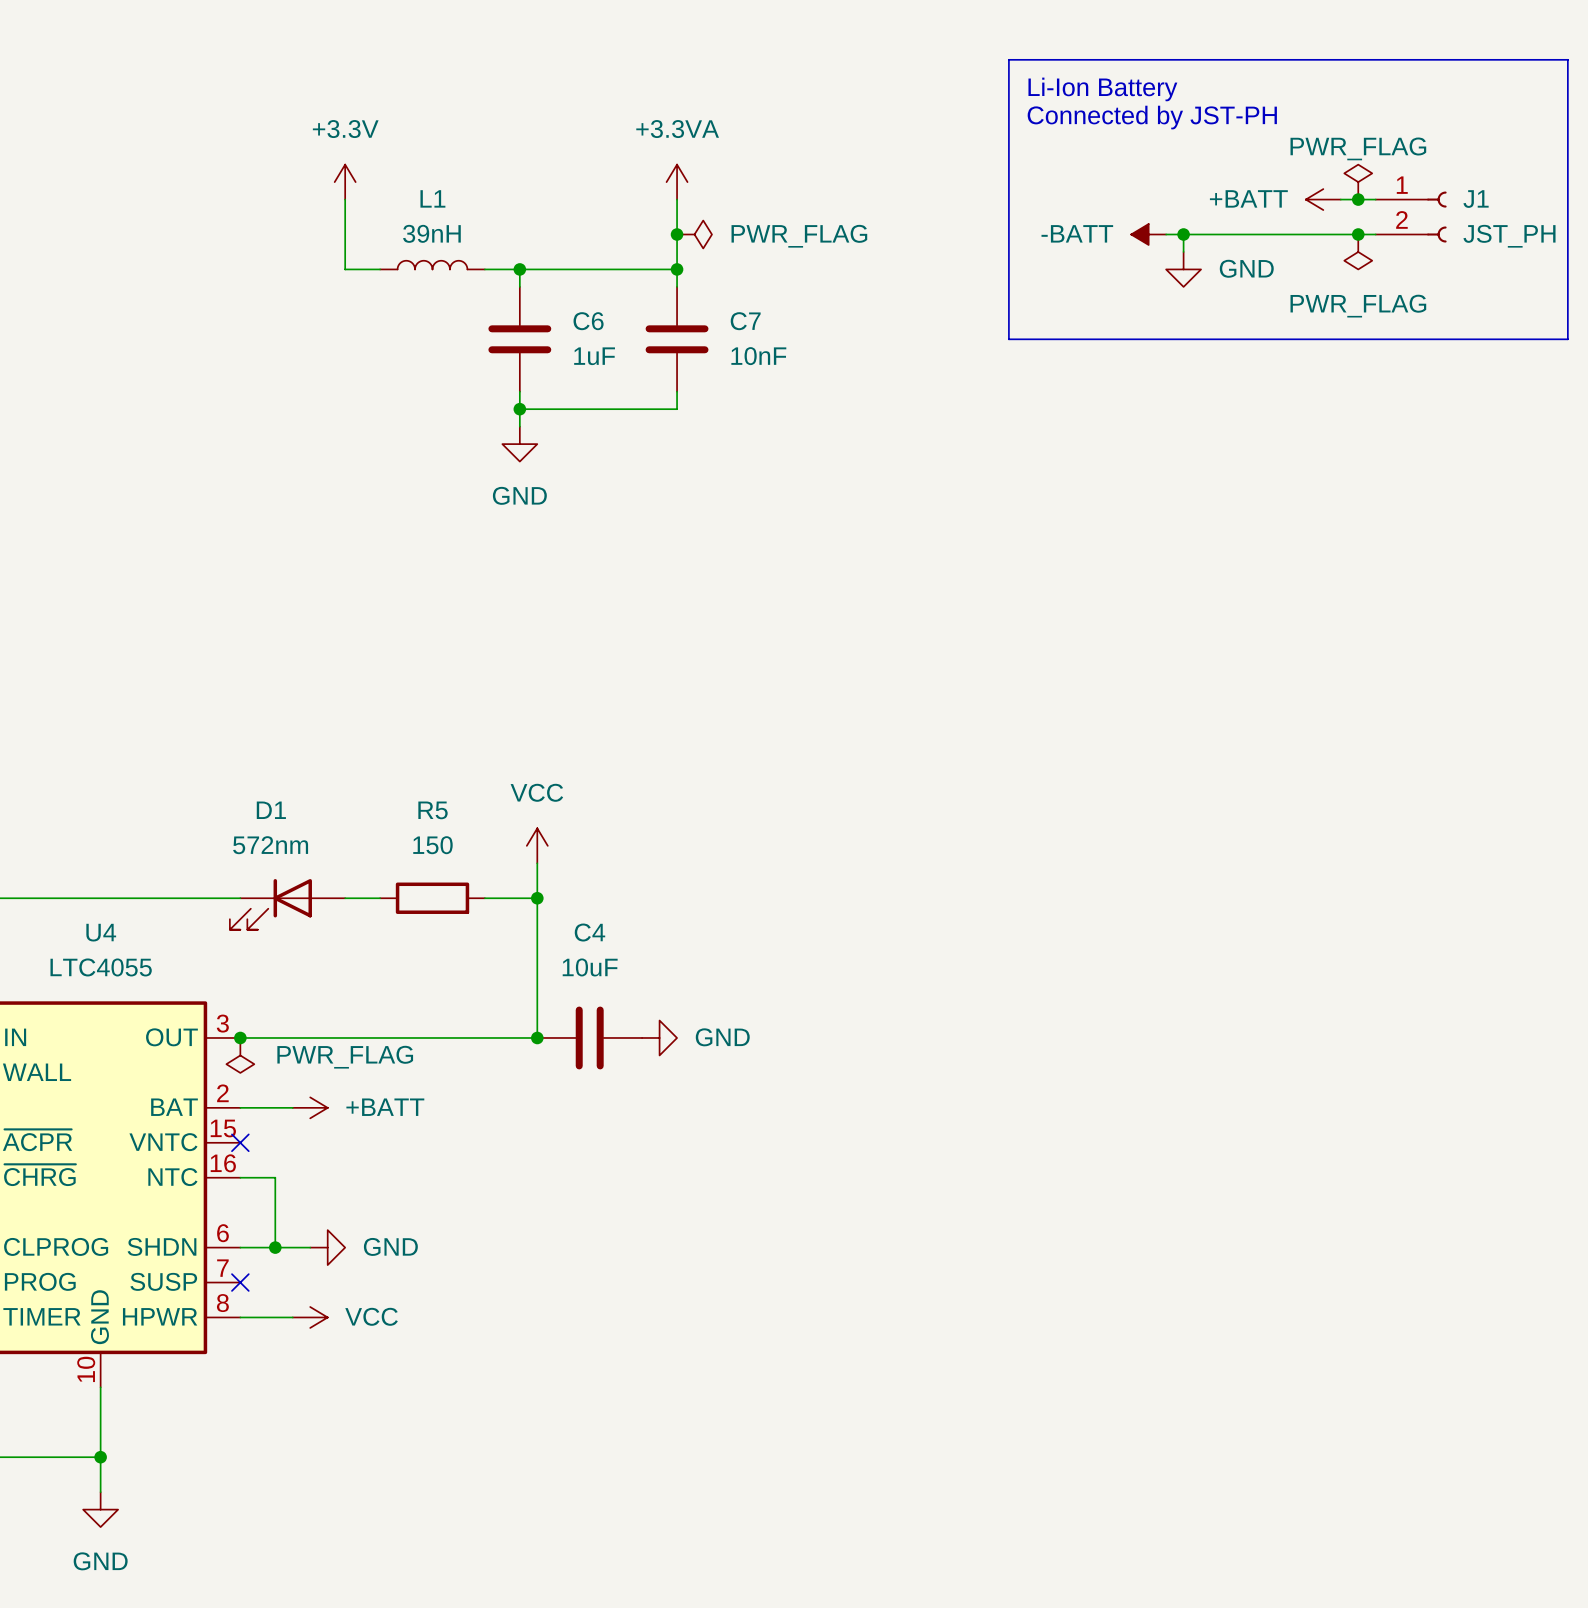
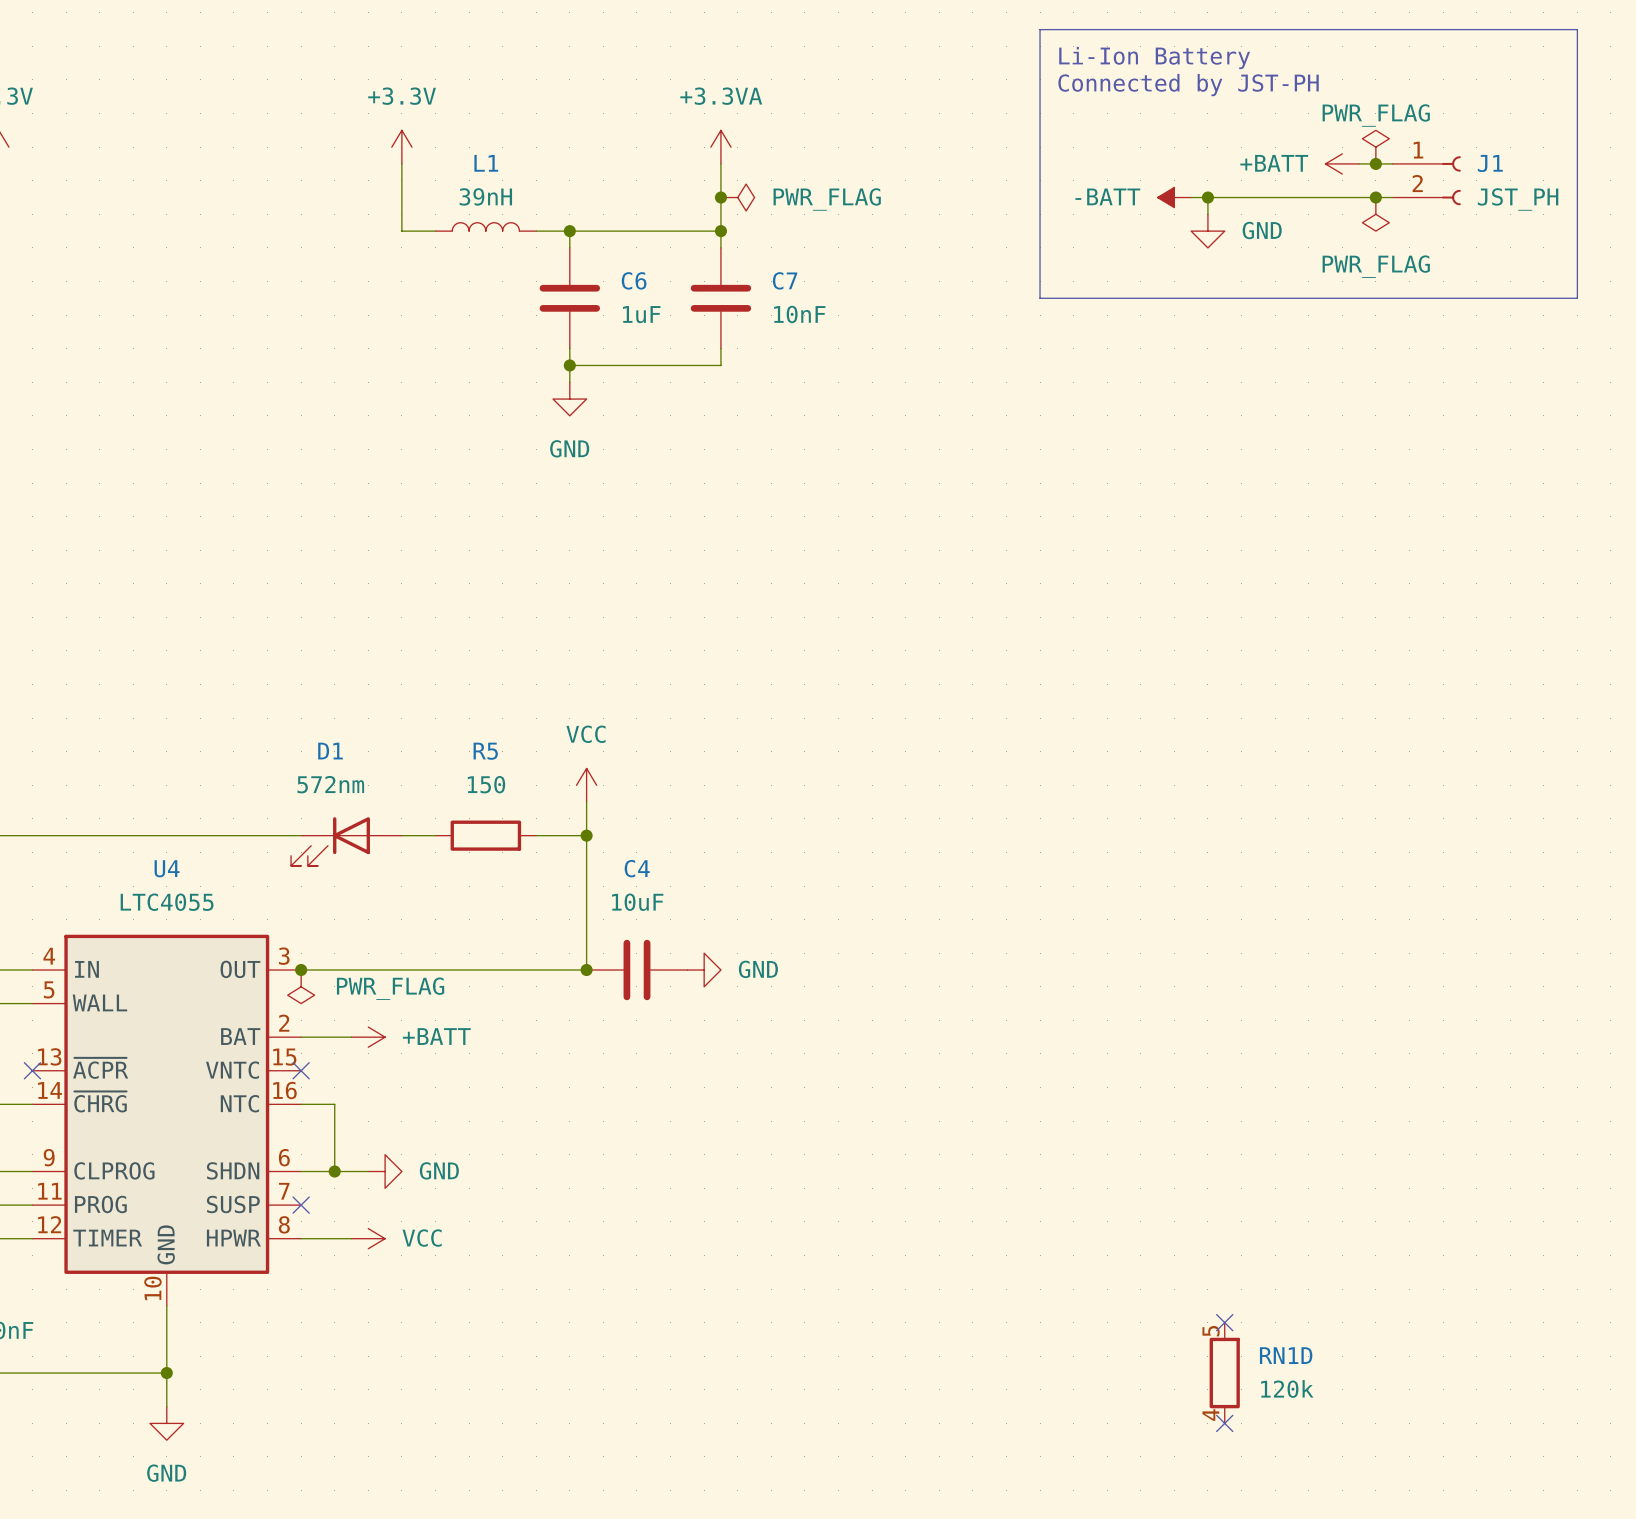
no-connect mark: none -> (1224, 1322)
RN1D: none -> 120k (1224, 1373)
no-connect mark: none -> (1224, 1423)

